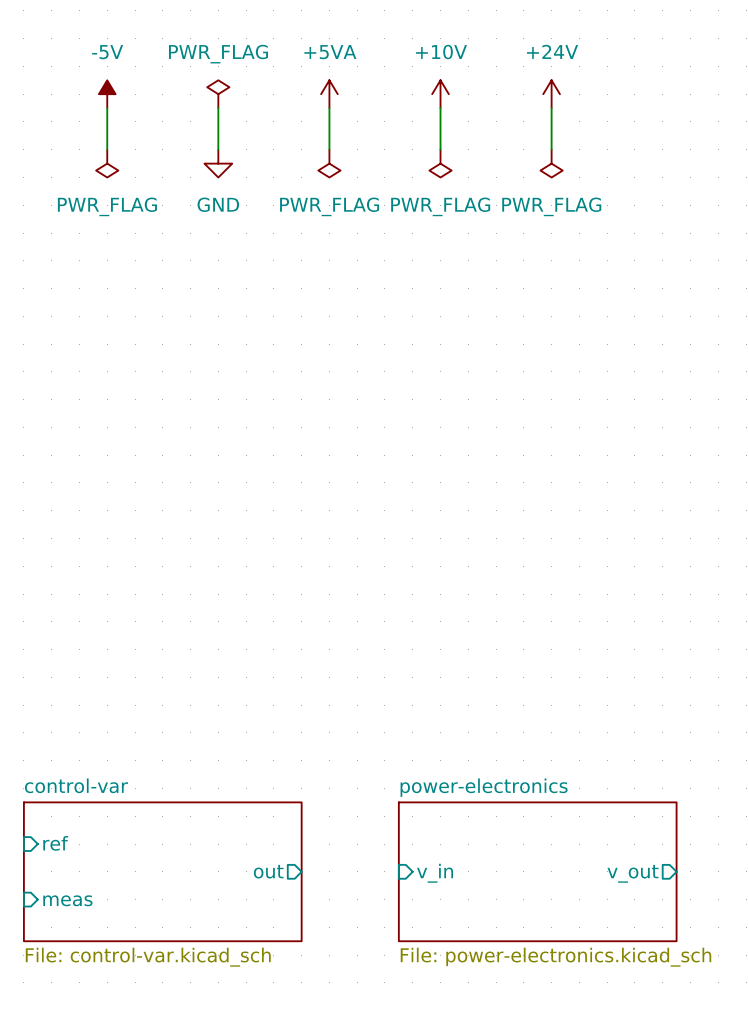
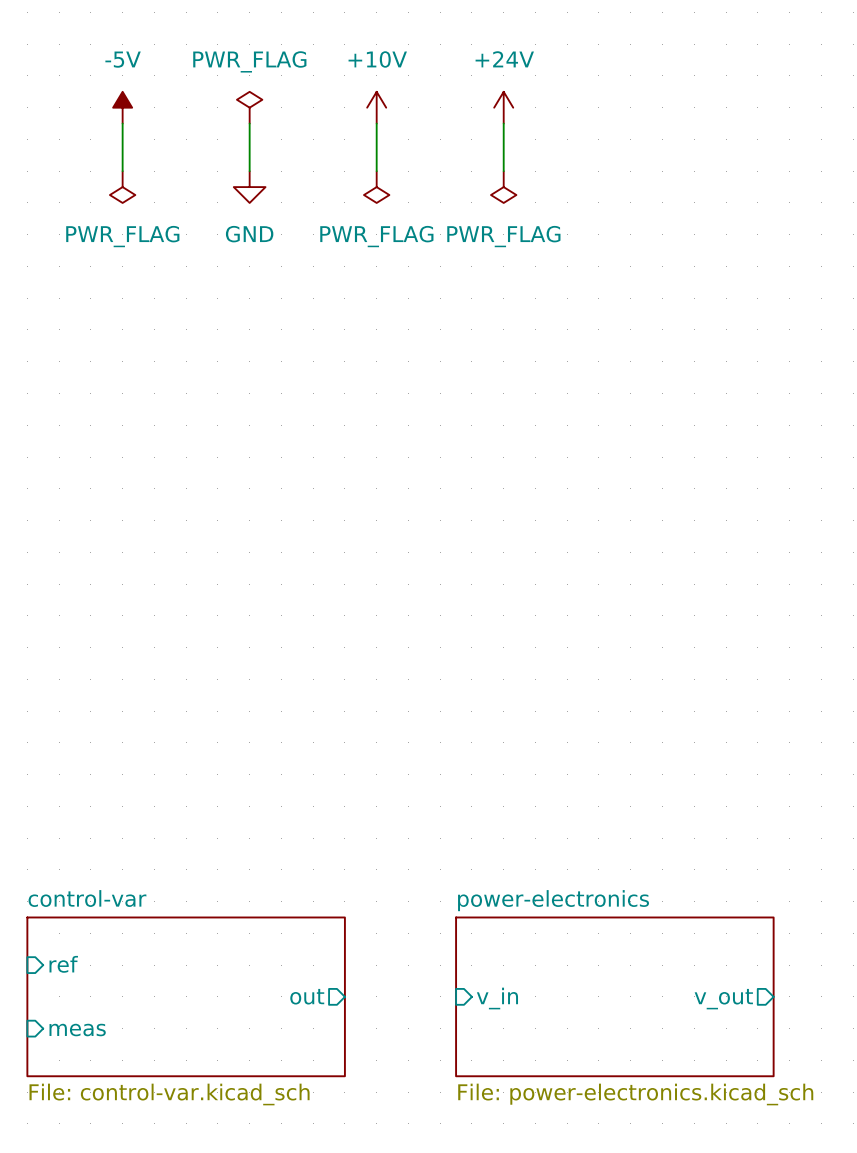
power symbol: +5VA (329, 94) -> +10V (376, 107)
power symbol: +10V (440, 94) -> +24V (503, 107)
power symbol: +24V (551, 94) -> none
wire: (551, 108) (551, 149) -> none
power symbol: PWR_FLAG (551, 163) -> none

